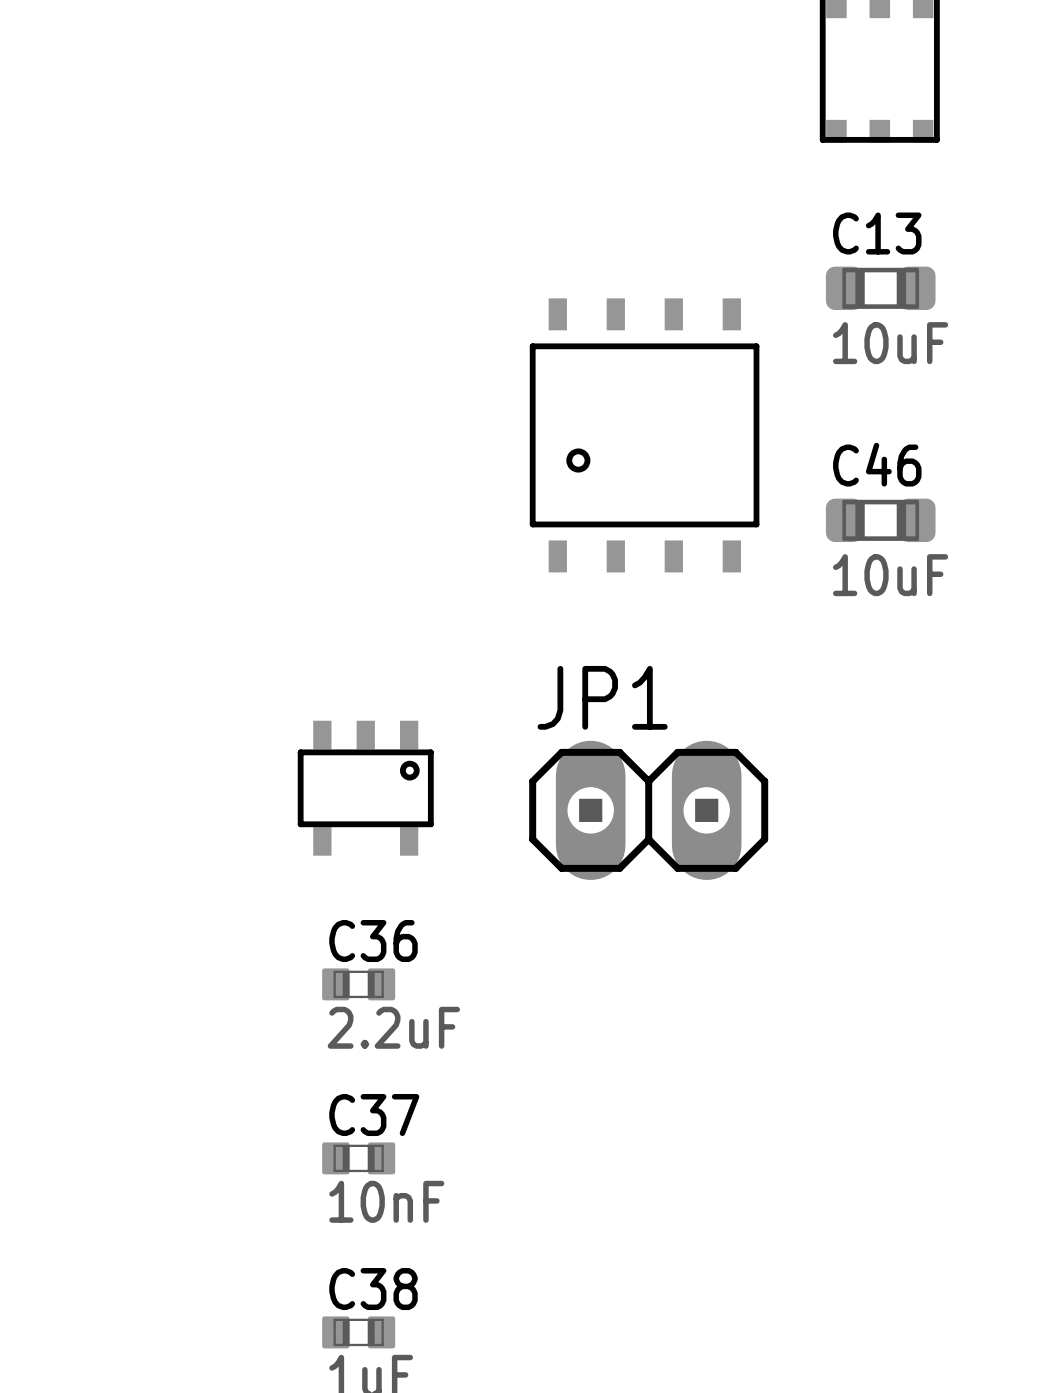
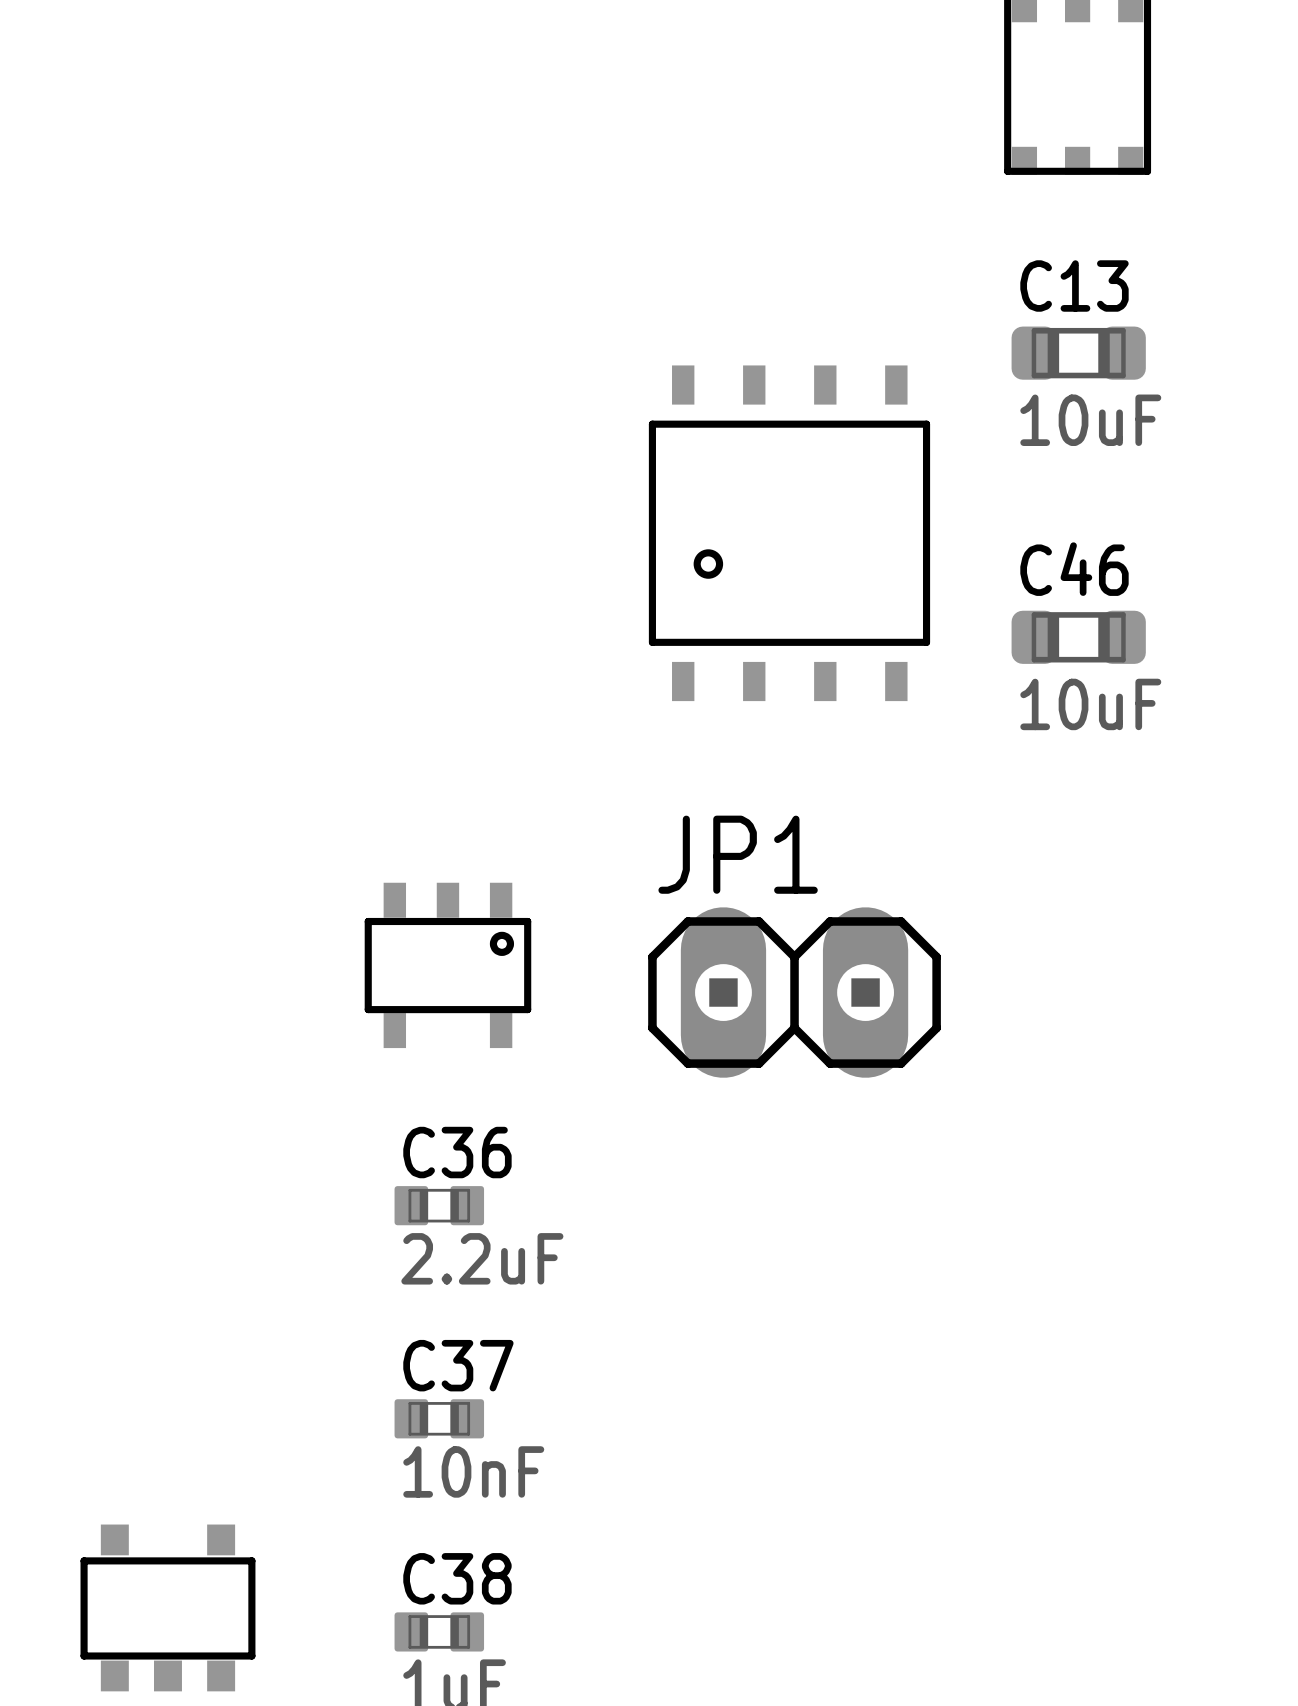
part: none -> (167, 1607)

